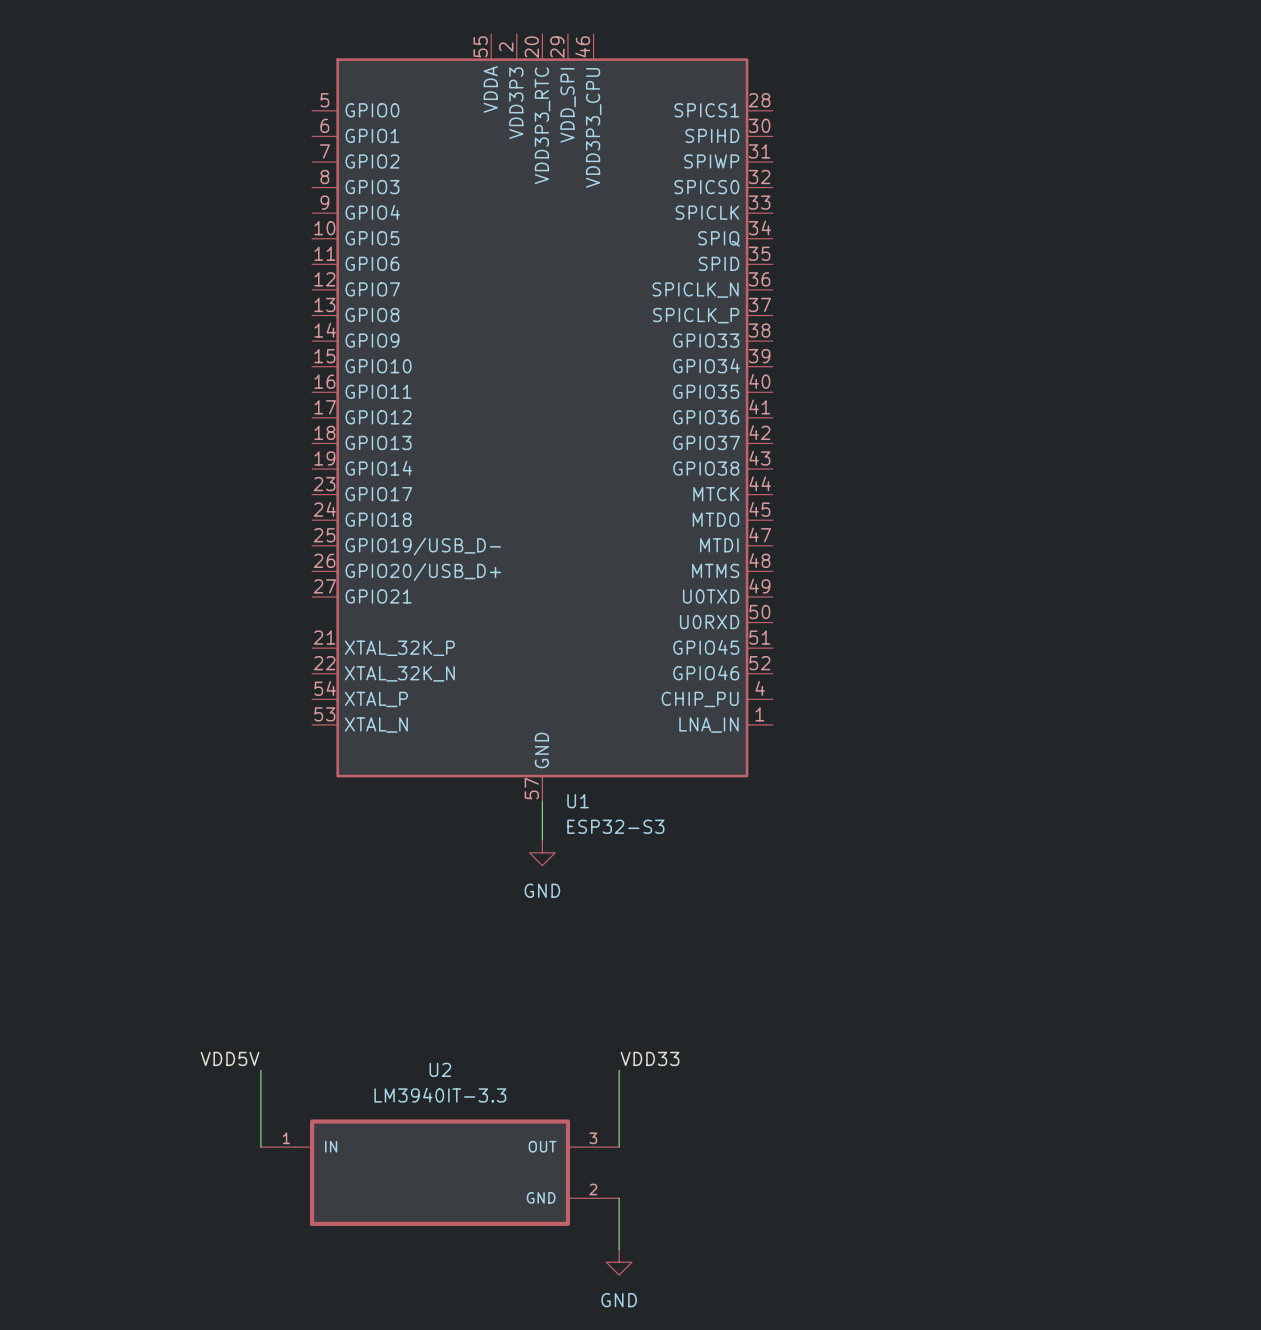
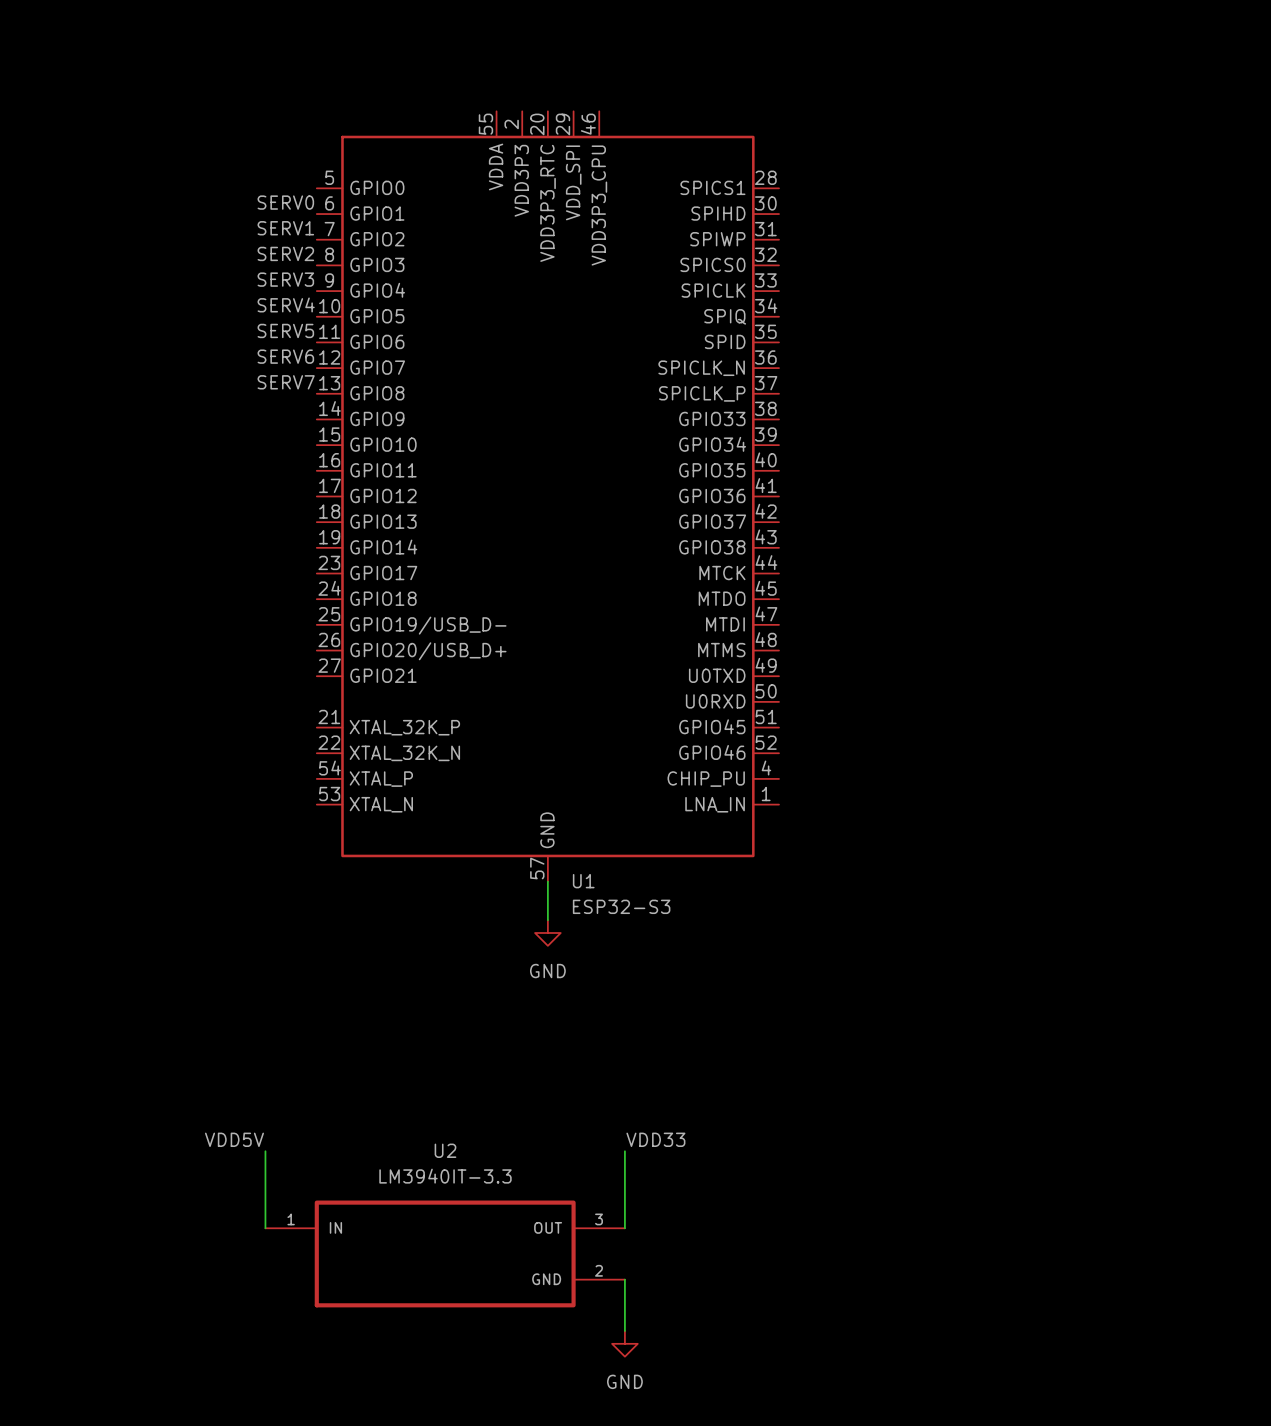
label: none -> SERV0 (285, 202)
label: none -> SERV1 (285, 228)
label: none -> SERV2 (285, 253)
label: none -> SERV3 (285, 279)
label: none -> SERV4 (286, 304)
label: none -> SERV5 (285, 330)
label: none -> SERV6 (285, 356)
label: none -> SERV7 (286, 382)

